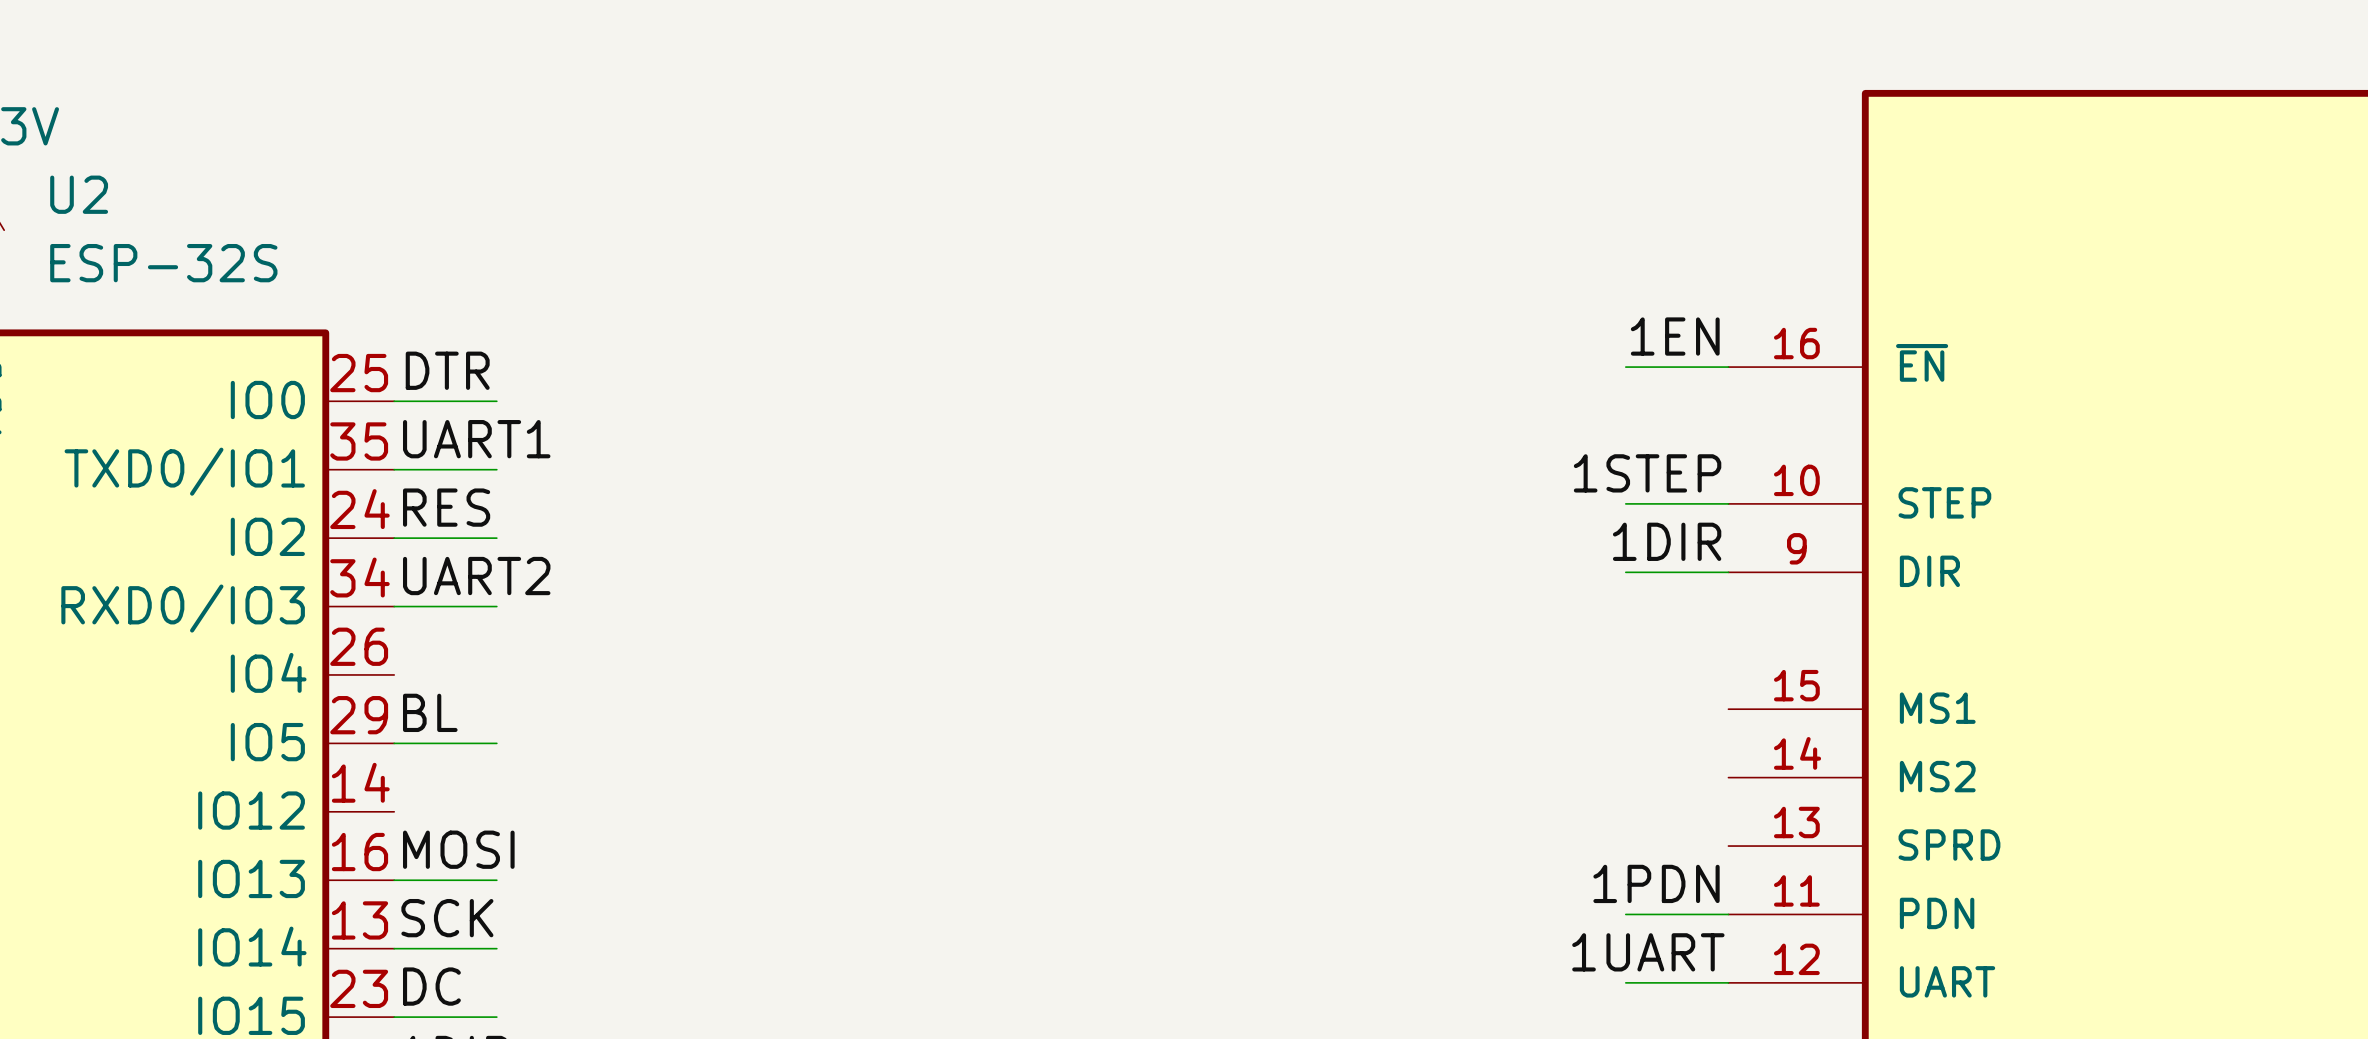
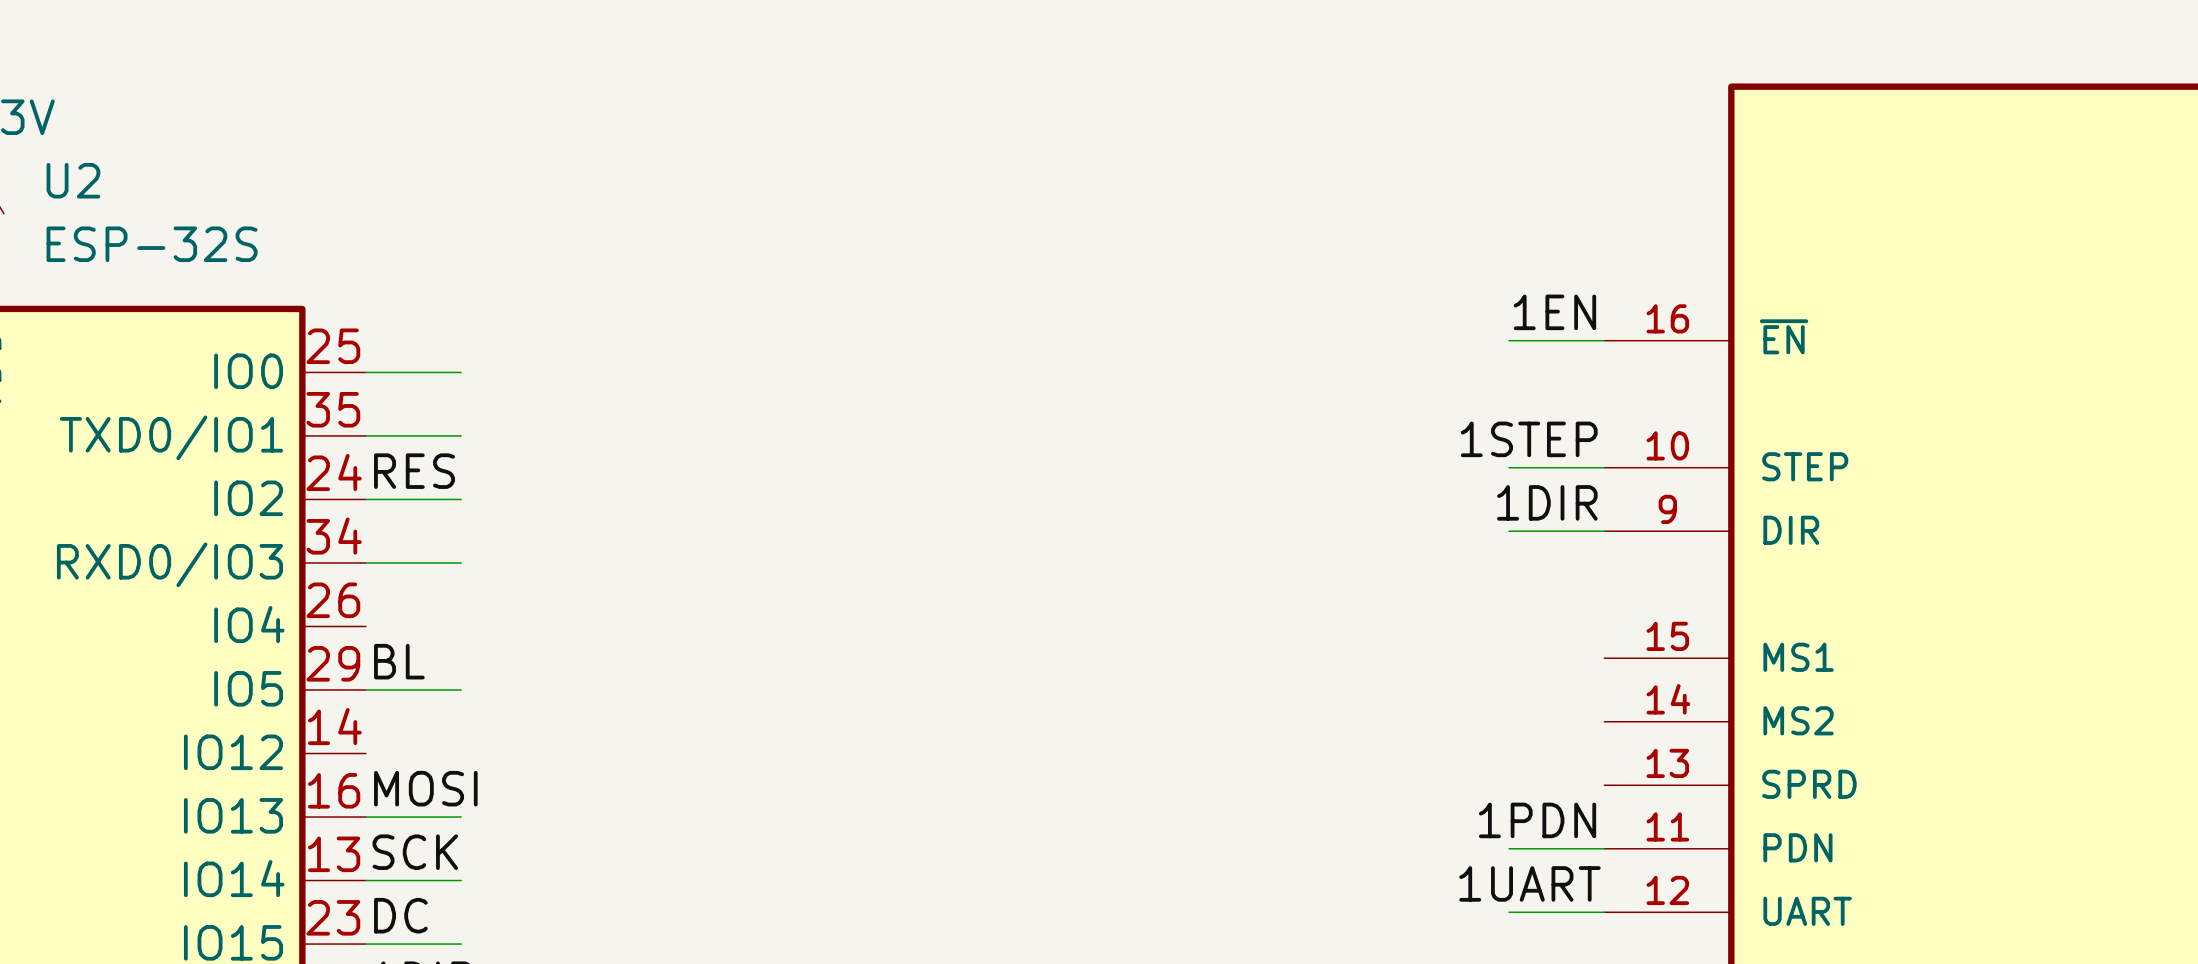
label: DTR (447, 370) -> none
label: UART1 (476, 439) -> none
label: UART2 (476, 576) -> none

